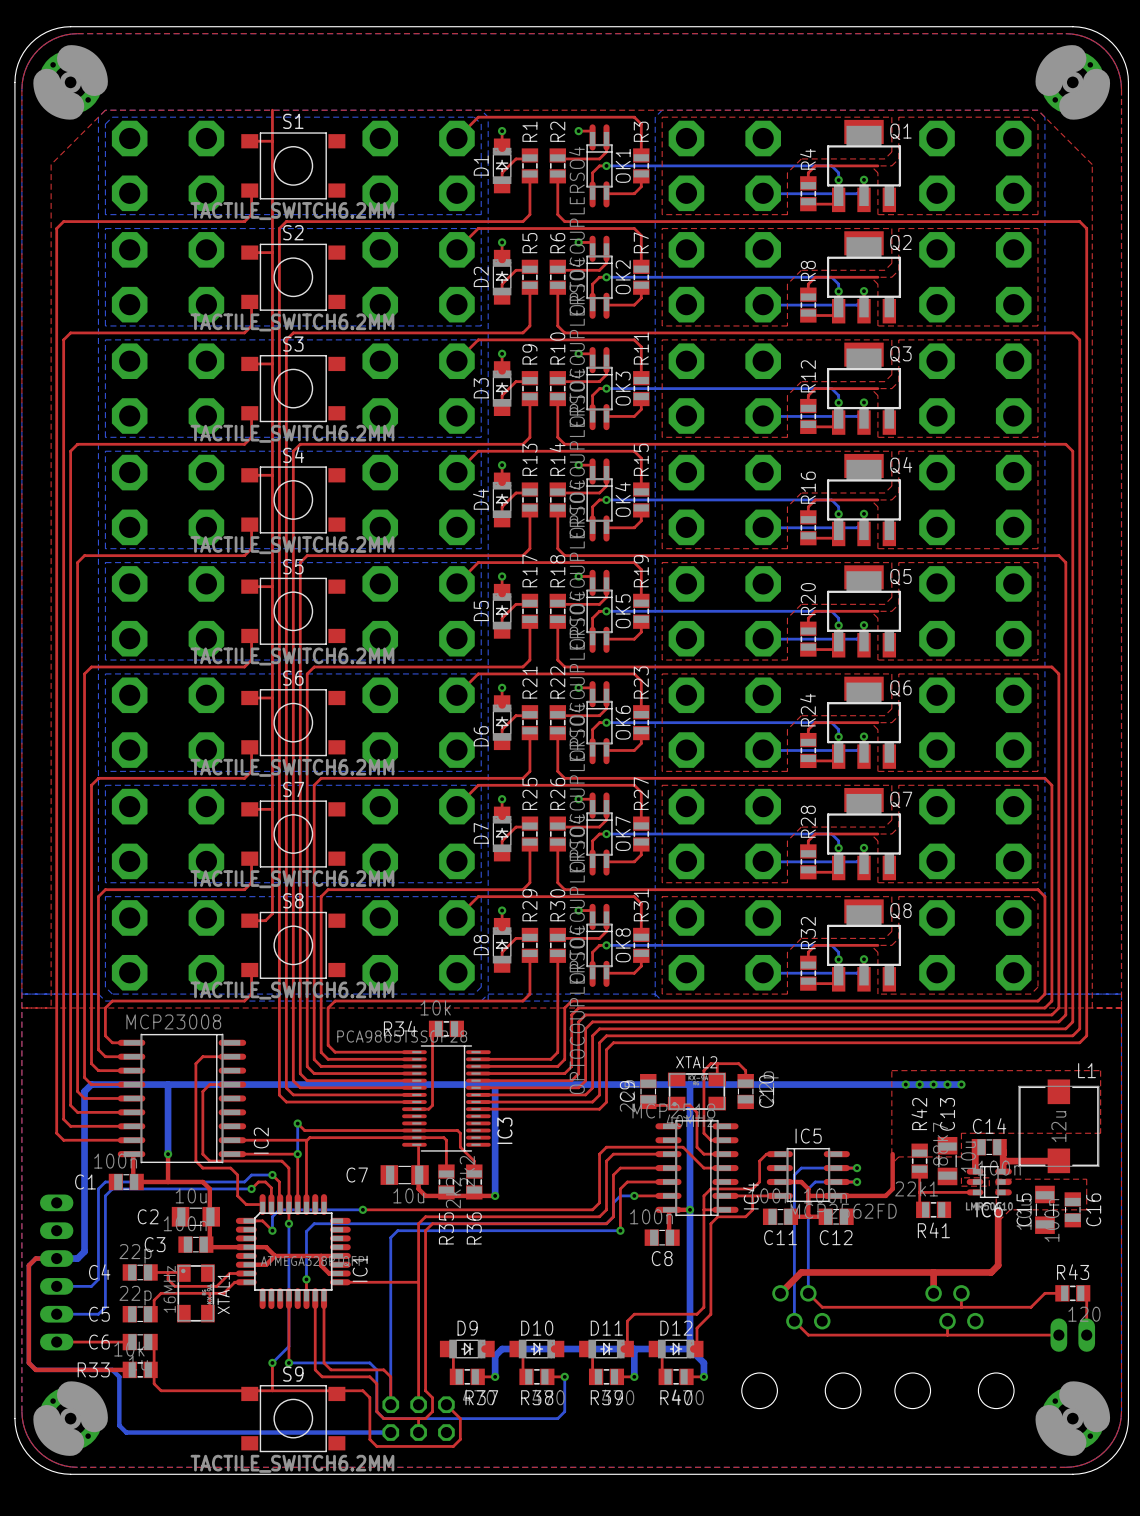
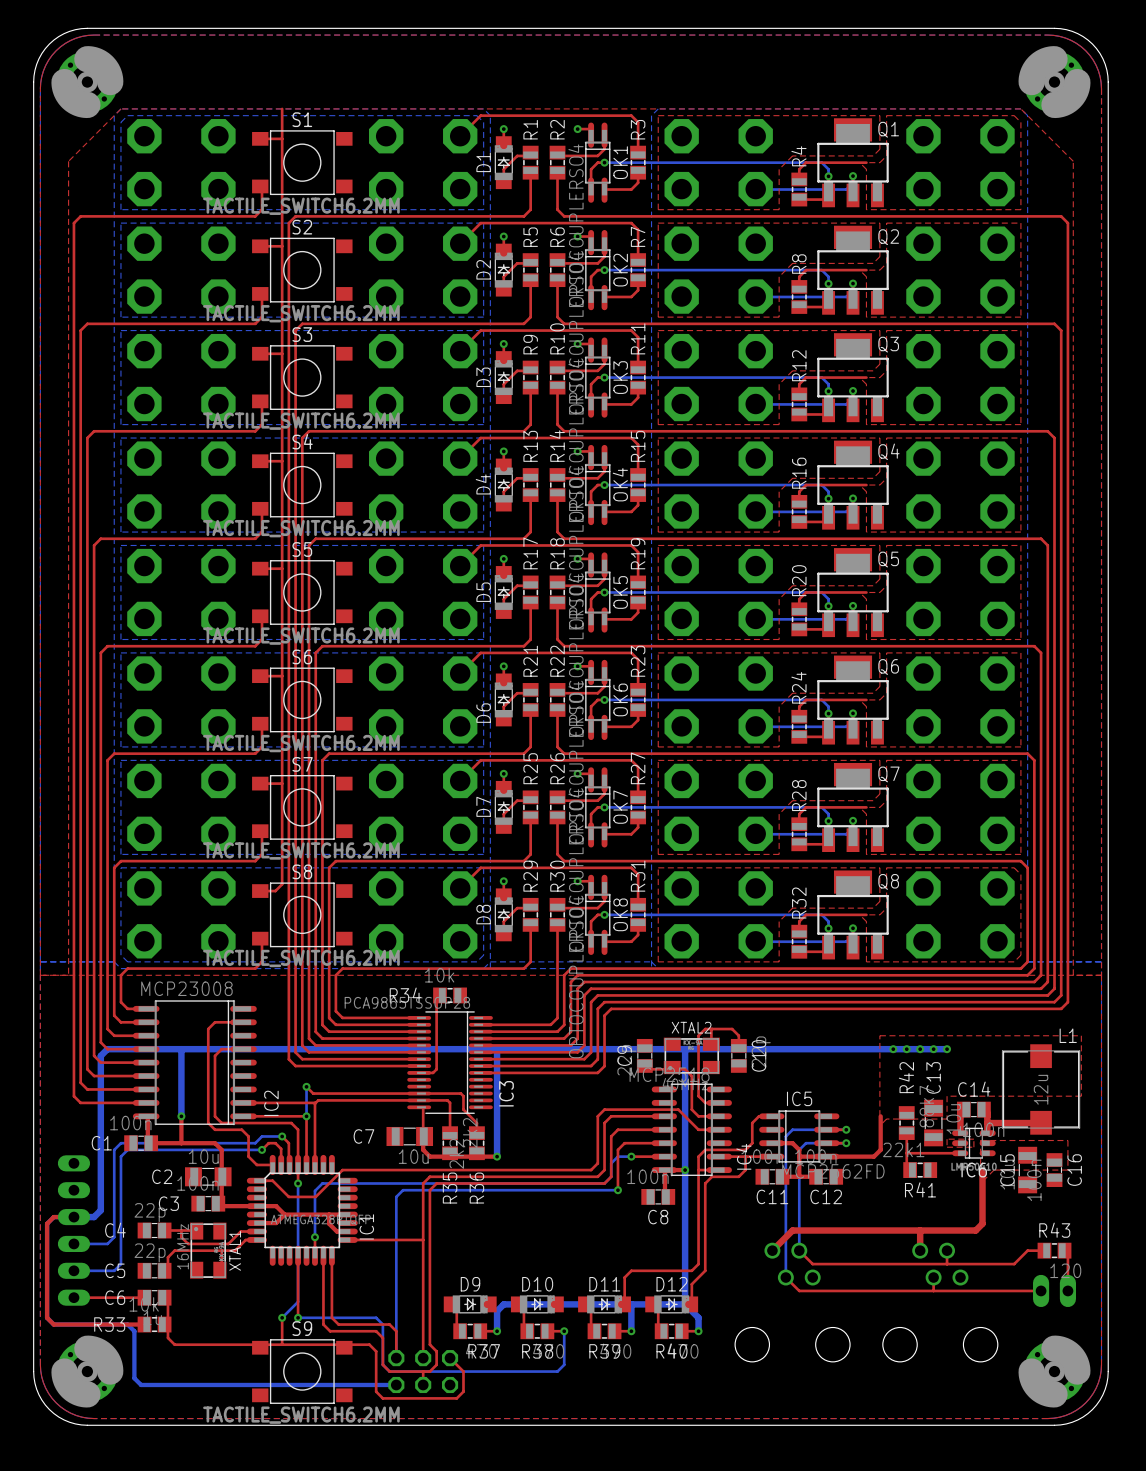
top track: none -> (369, 1170) (342, 1170) (315, 1196) (288, 1196) (282, 1190)
bottom track: (362, 1209) (279, 1209) (272, 1216) (272, 1230) -> none
via: (362, 1209) -> none
via: (272, 1230) -> none

